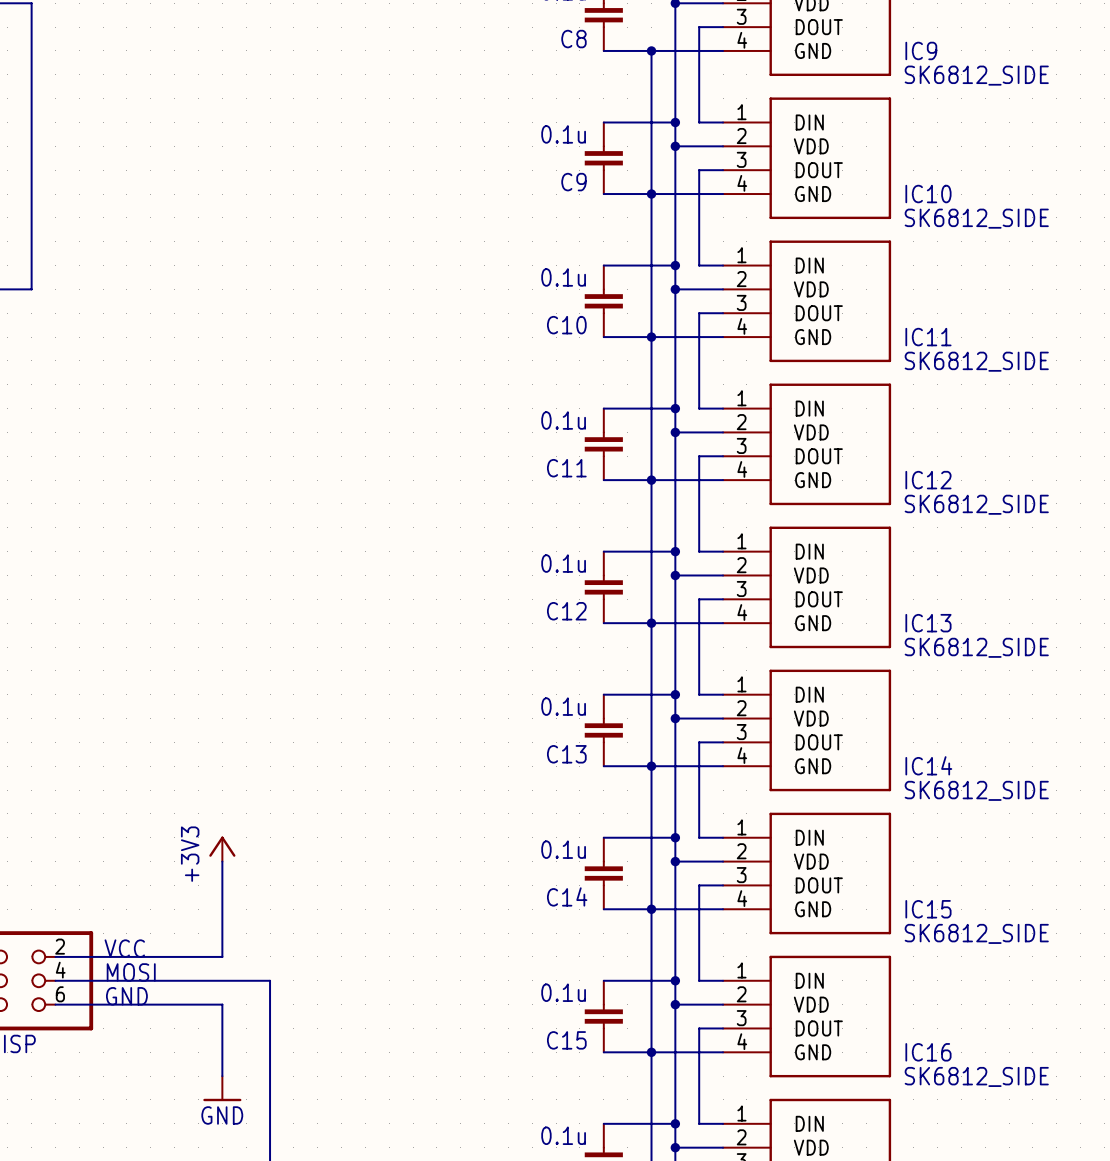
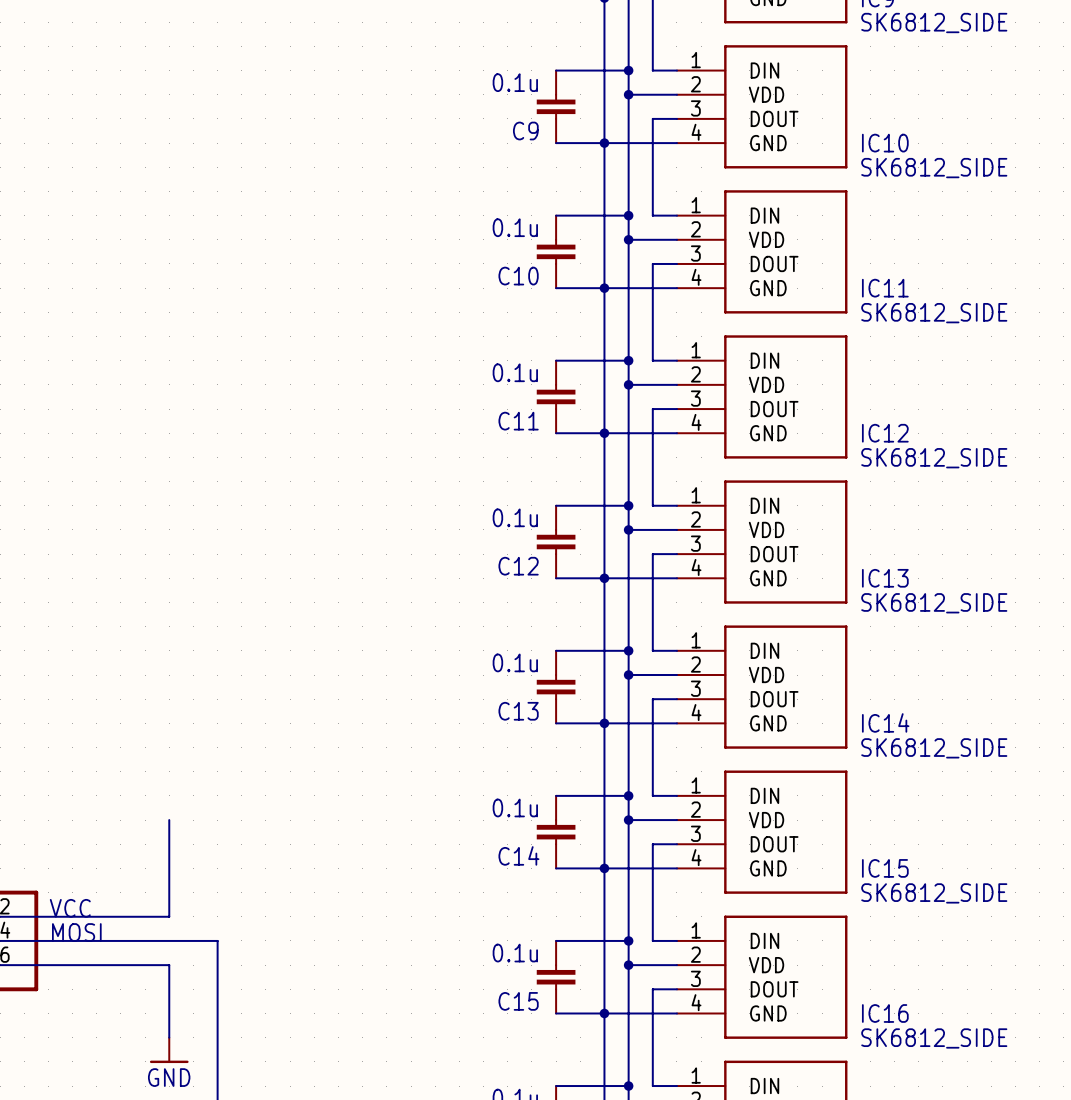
power symbol: +3V3 (222, 849) -> none
text: GND (126, 996) -> none

